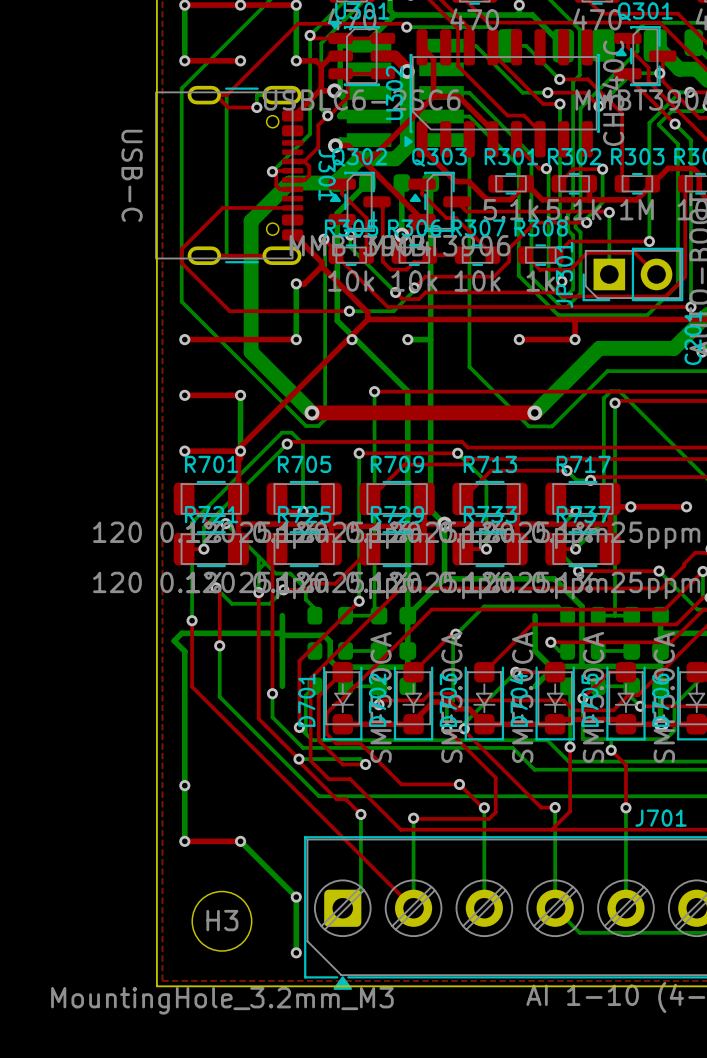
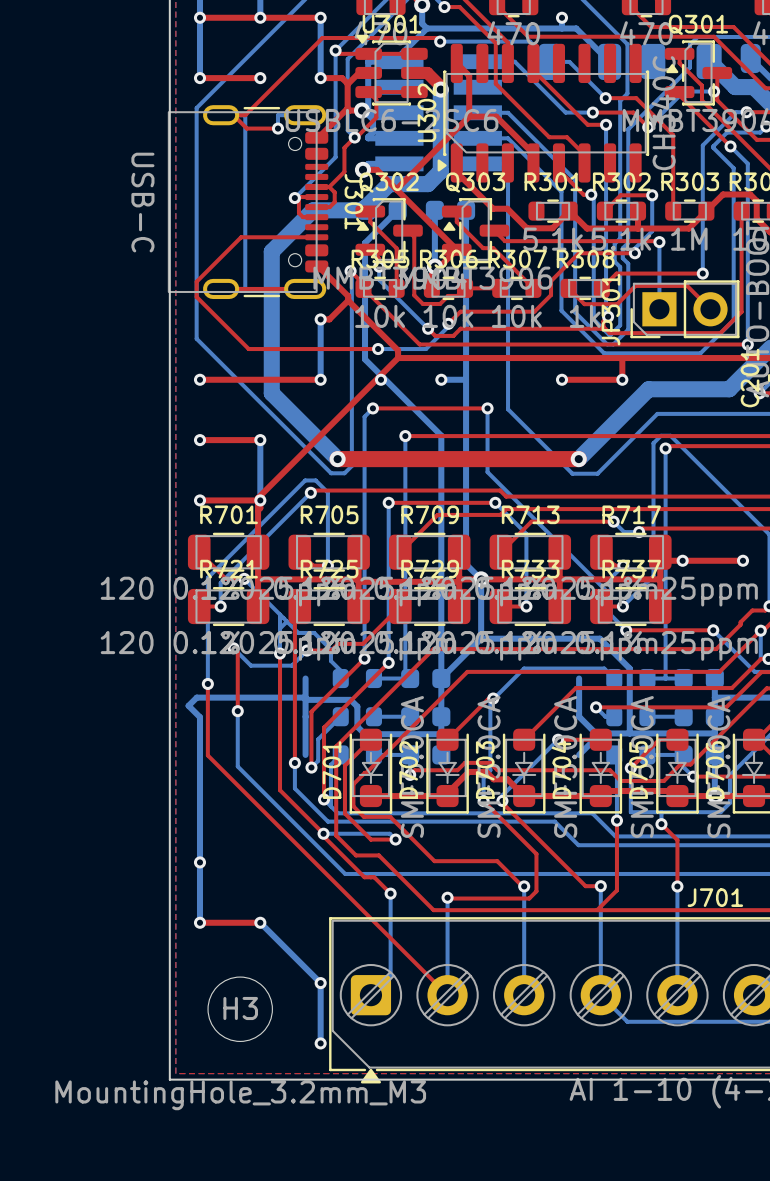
top track: none -> (372, 408) (487, 408)
bottom track: none -> (372, 408) (364, 416) (364, 658)
via: none -> (372, 408)
bottom track: none -> (487, 408) (487, 472) (610, 595)
via: none -> (487, 408)
top track: none -> (364, 658) (311, 711) (311, 767)
via: none -> (364, 658)
bottom track: none -> (340, 716) (318, 739) (318, 760) (311, 767)
via: none -> (311, 767)
via: (459, 784) -> none

